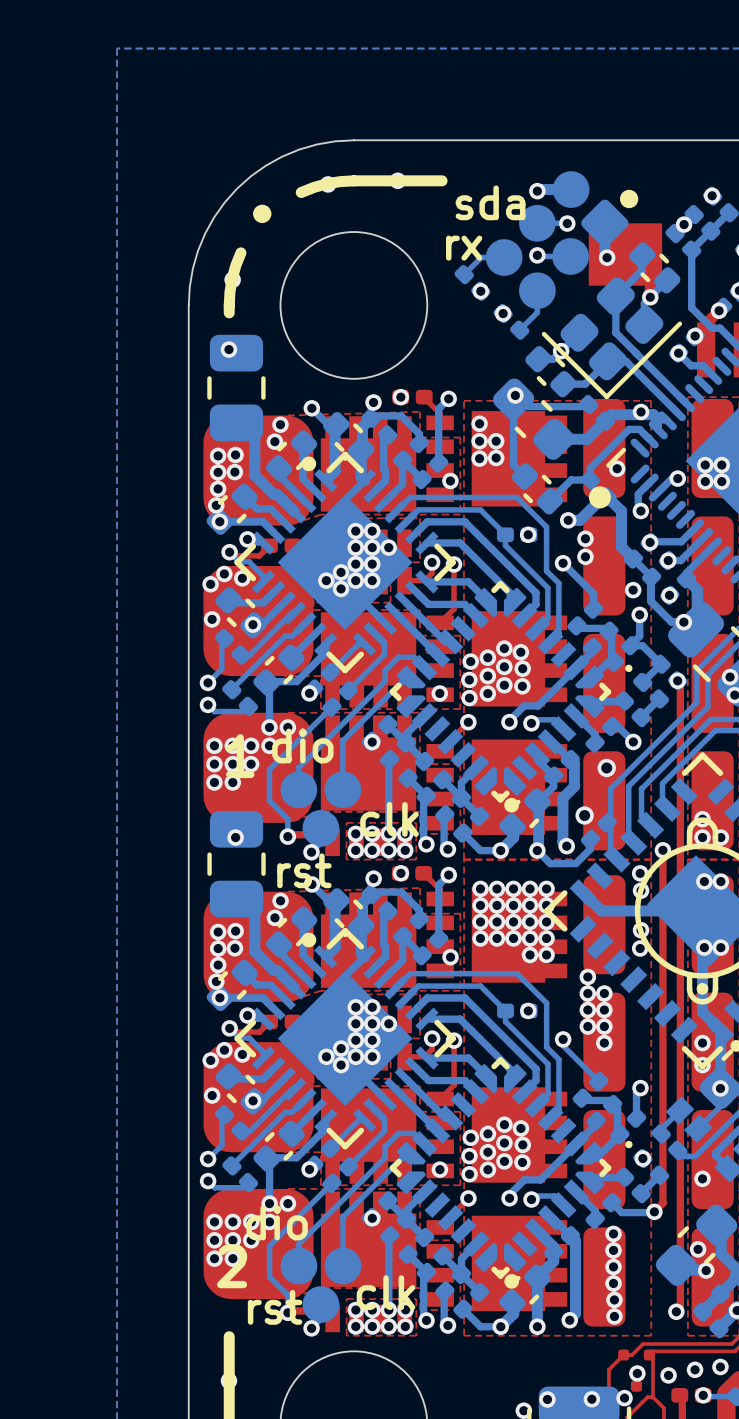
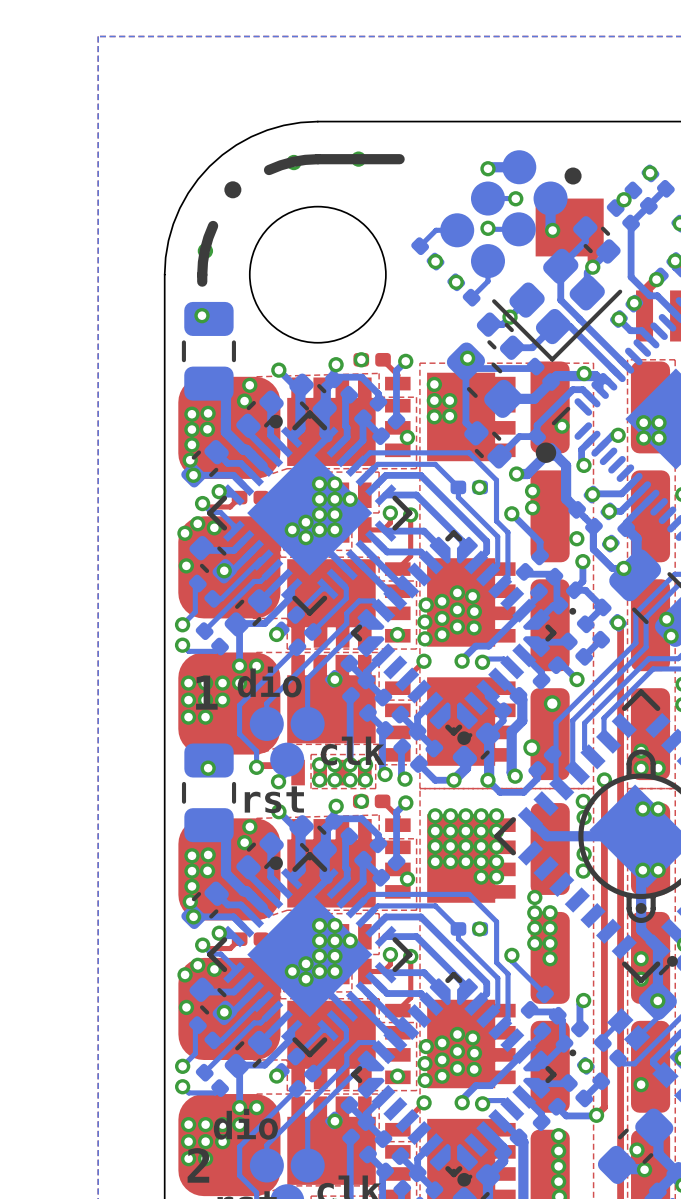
part footprint: [581, 199, 629, 247] -> [533, 181, 568, 216]
text: sda (490, 202) -> none
text: rx (464, 248) -> none

